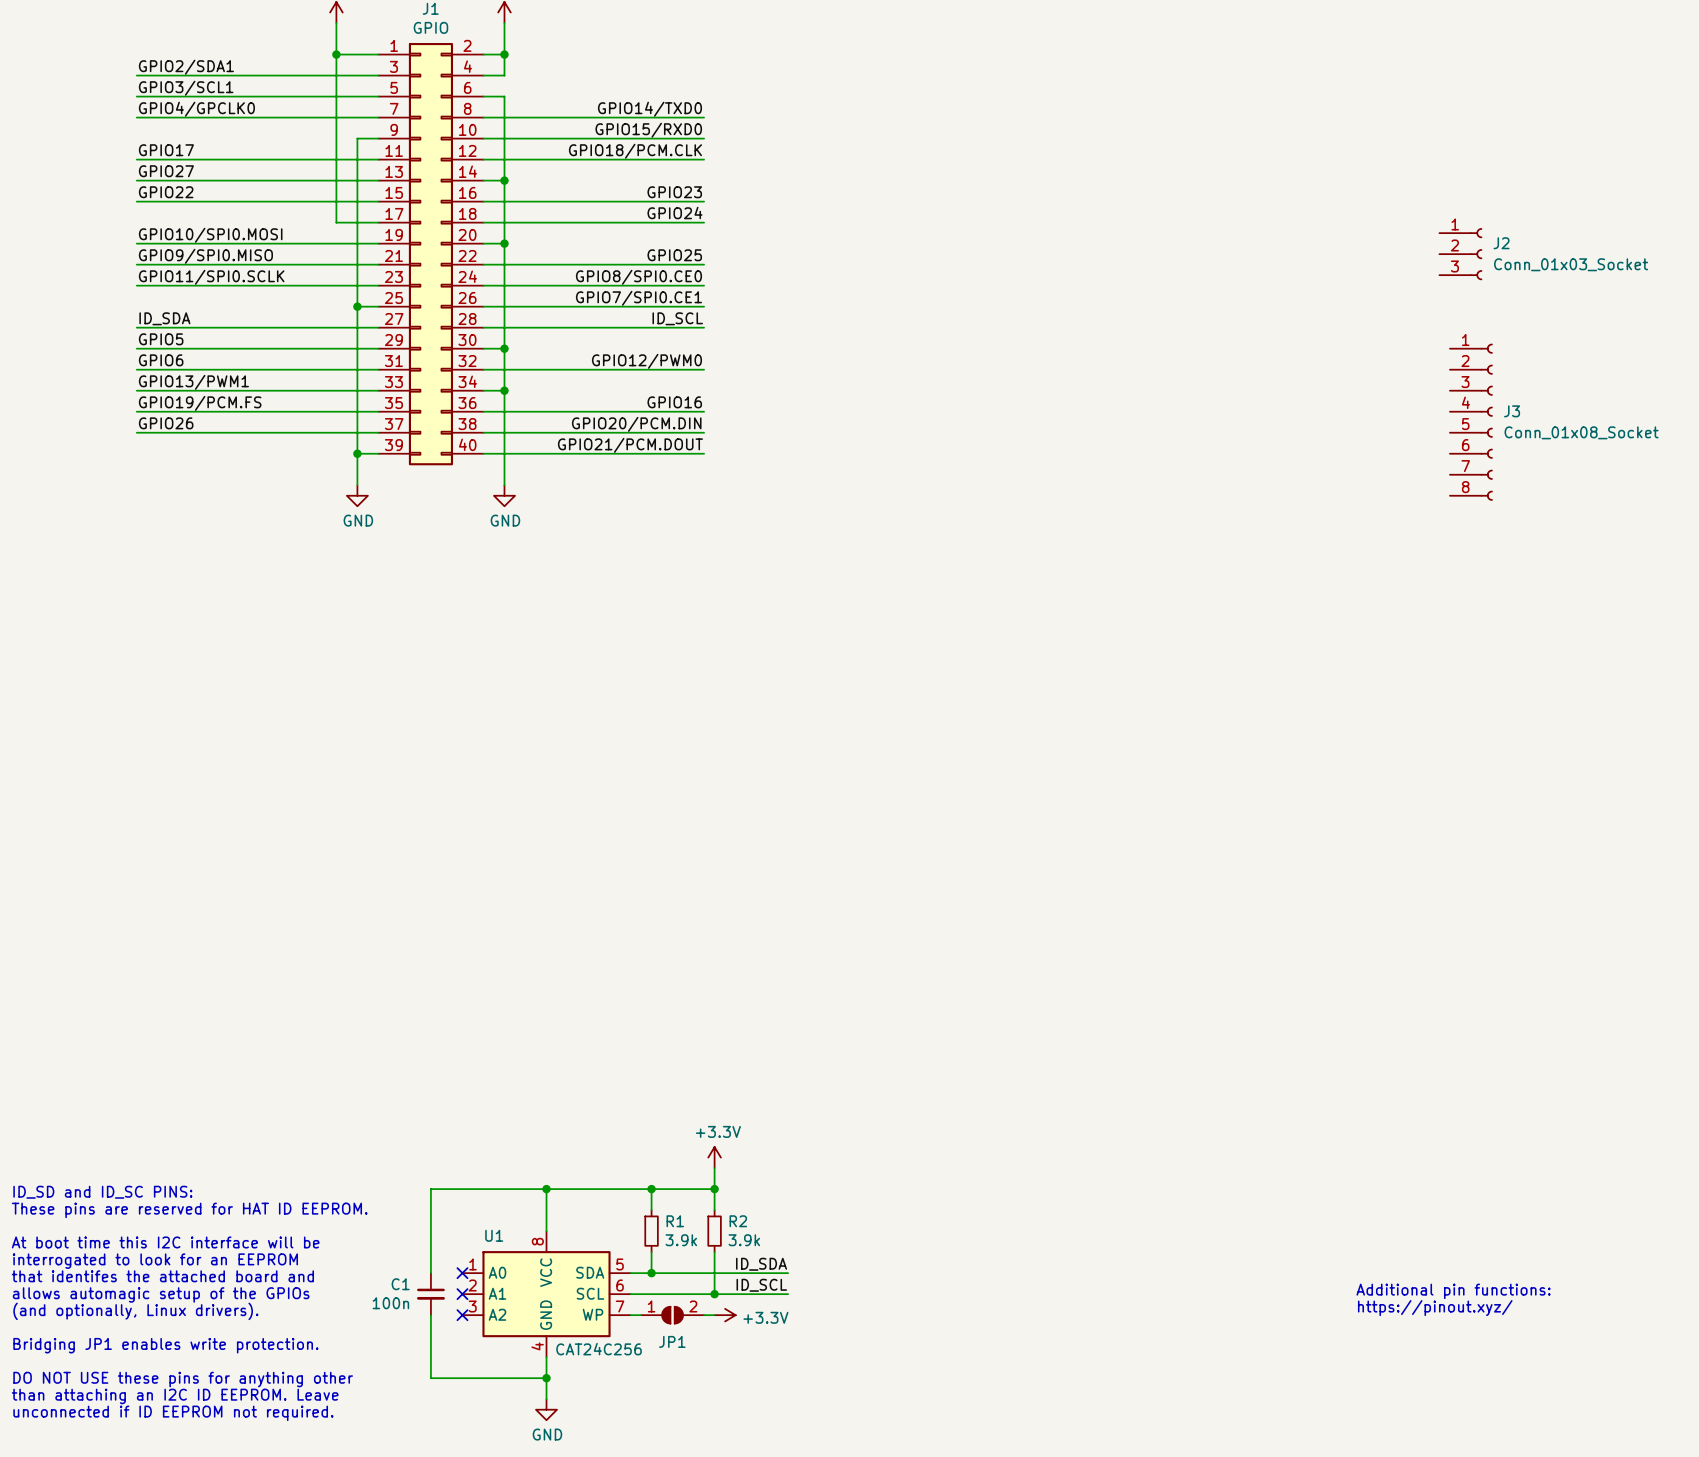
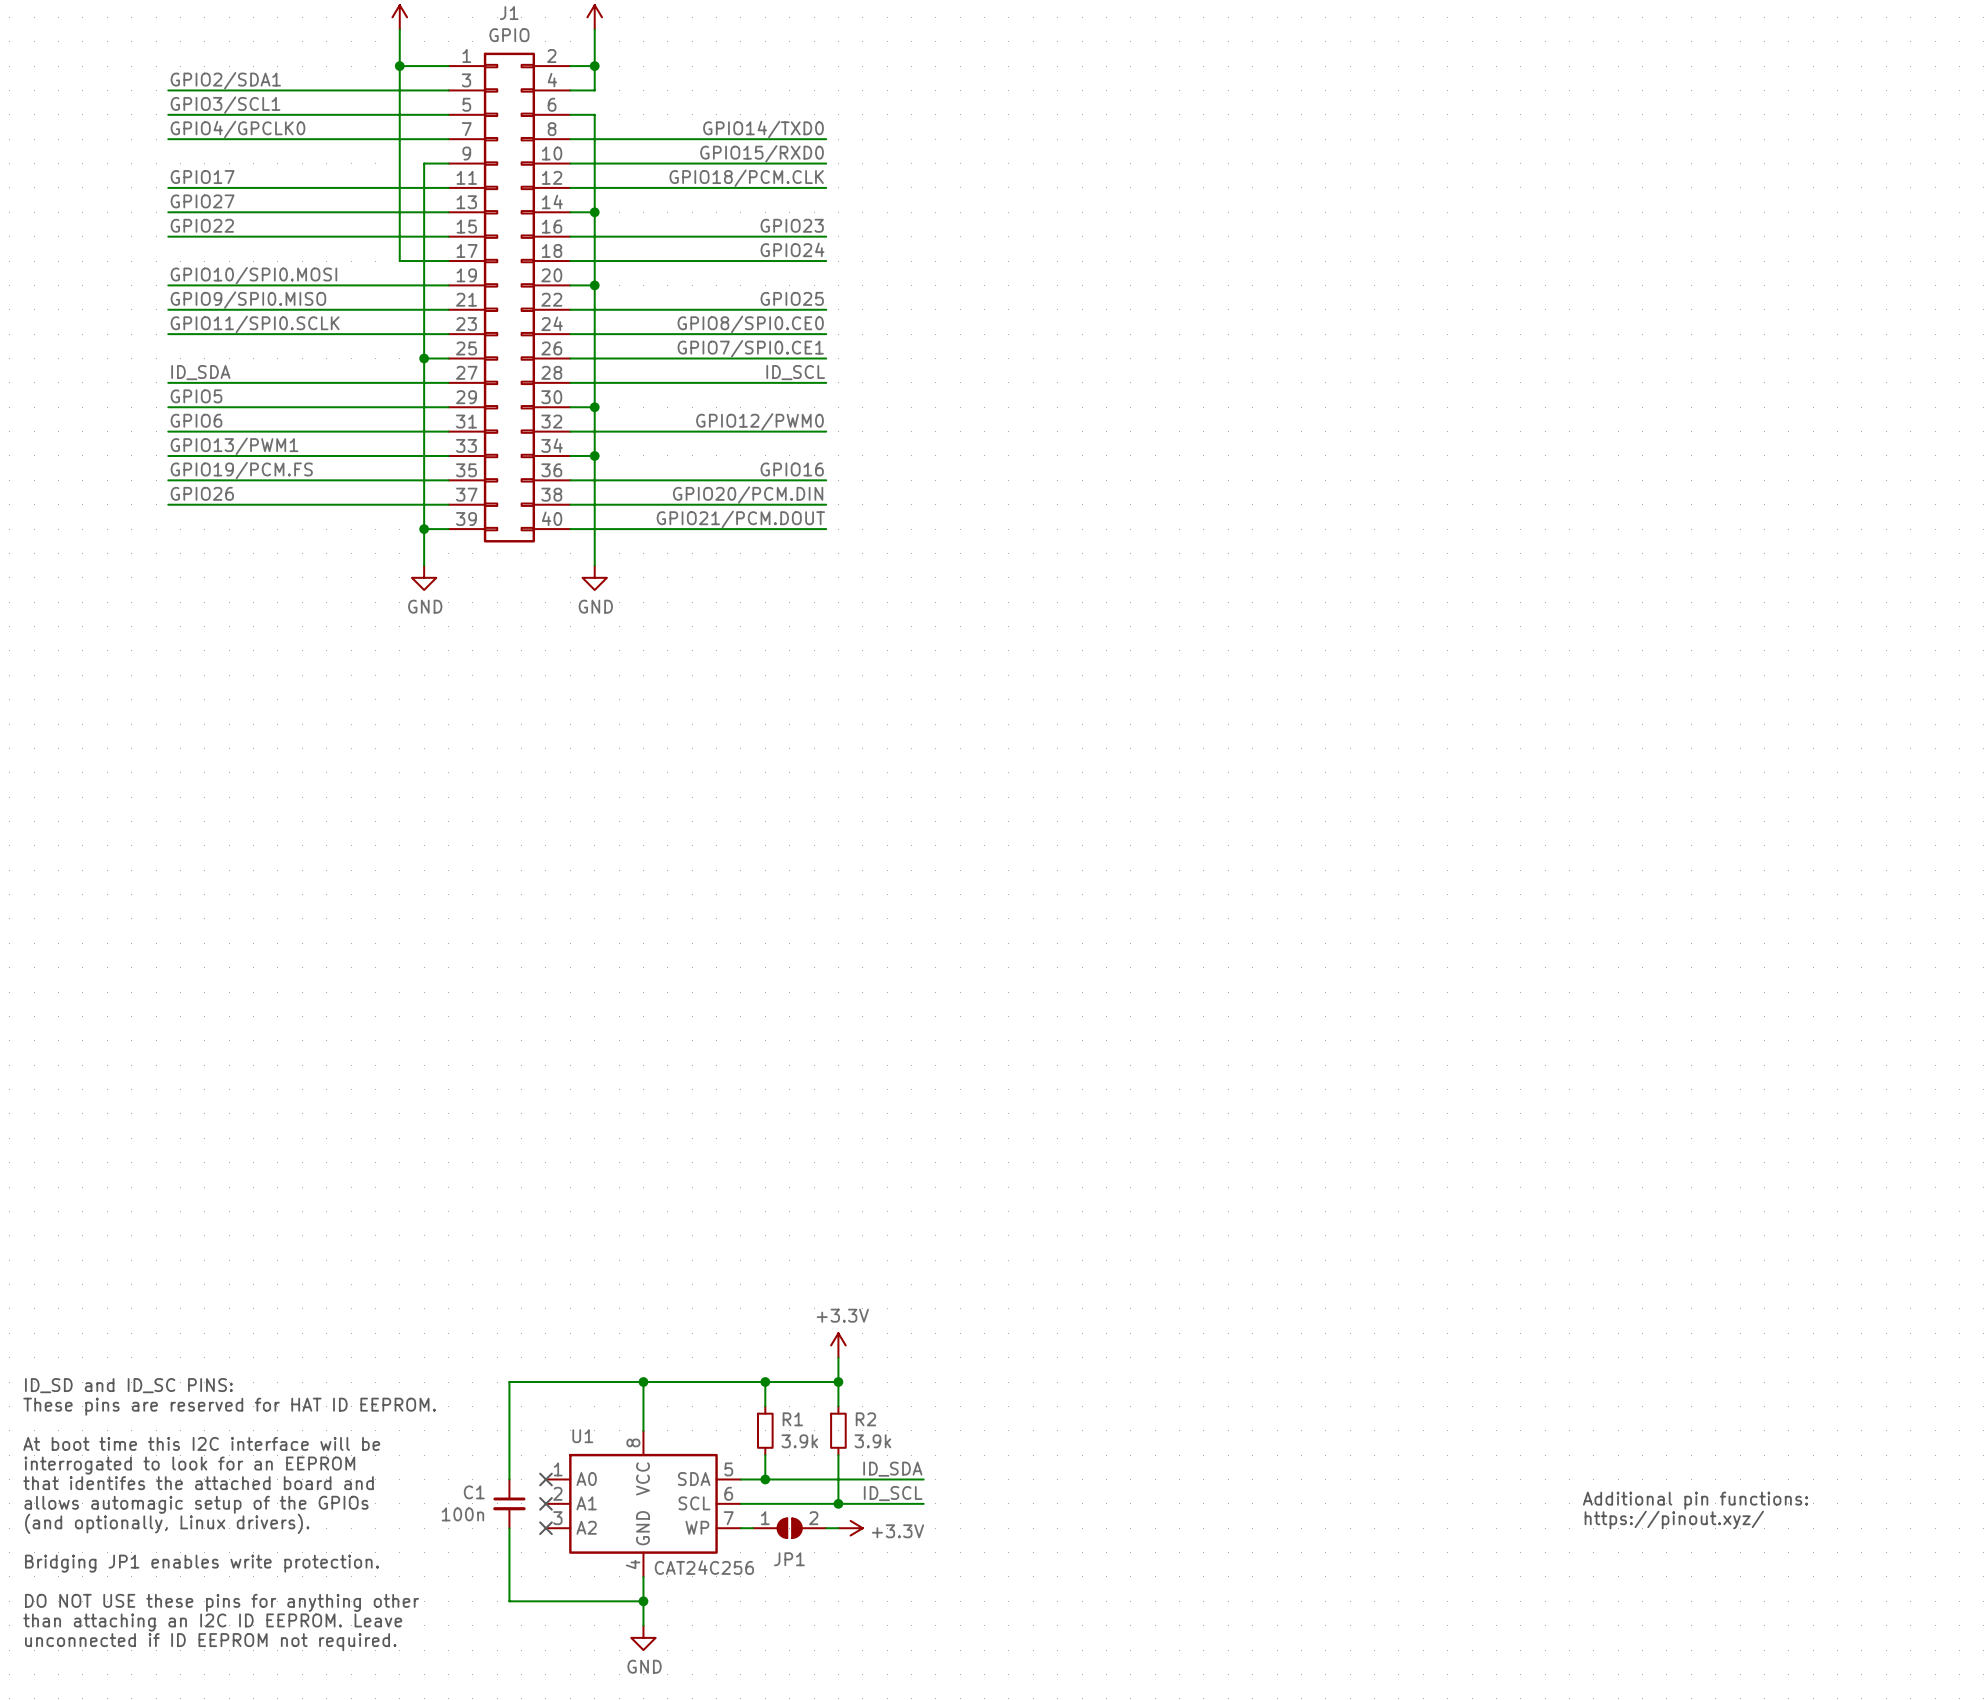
J2: Conn_01x03_Socket (1460, 254) -> none
J3: Conn_01x08_Socket (1471, 422) -> none

